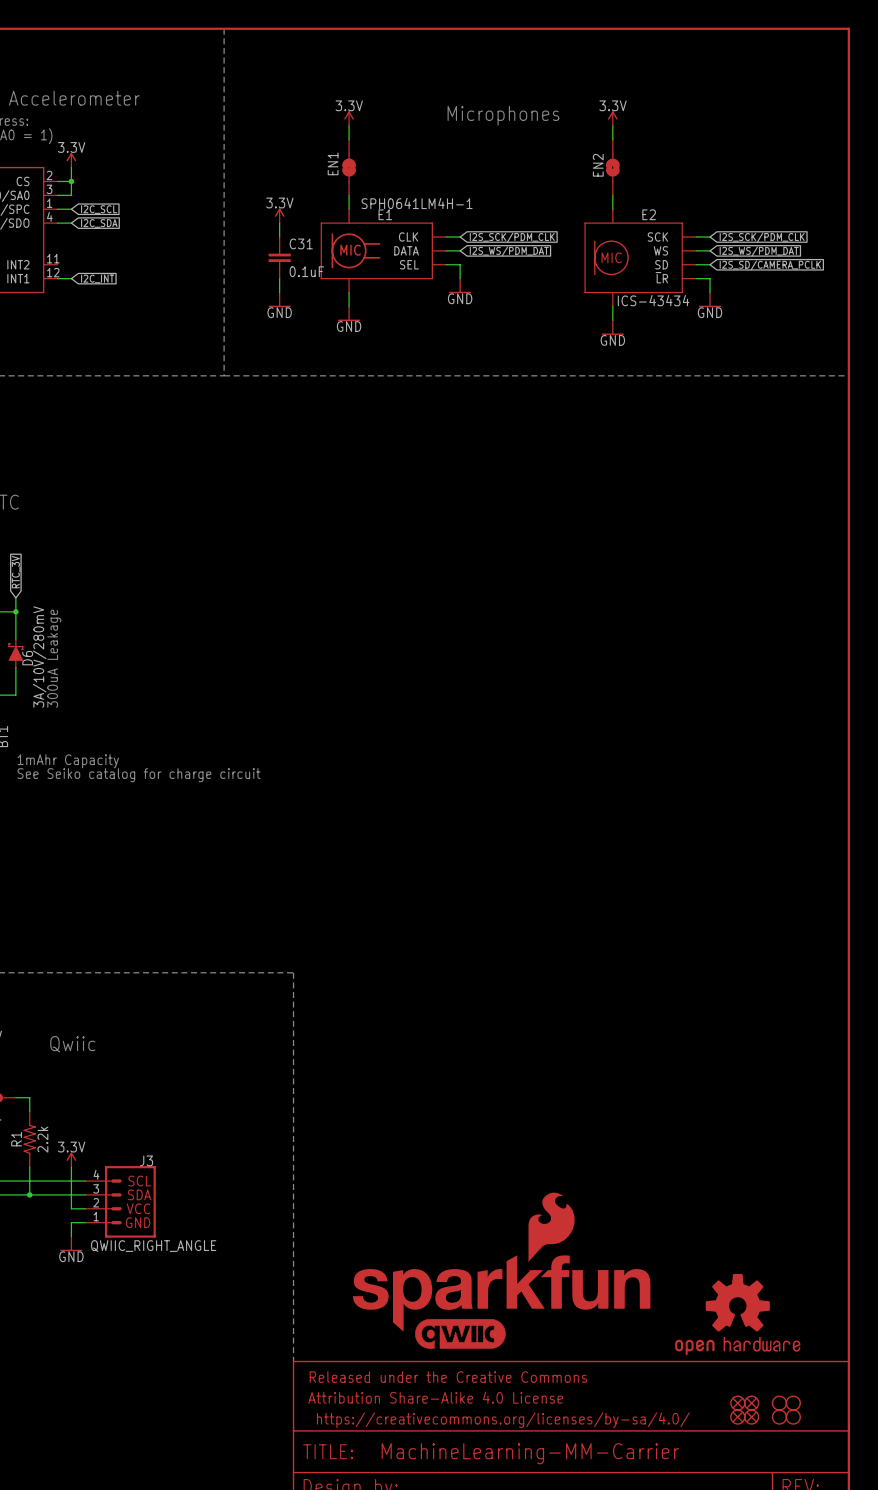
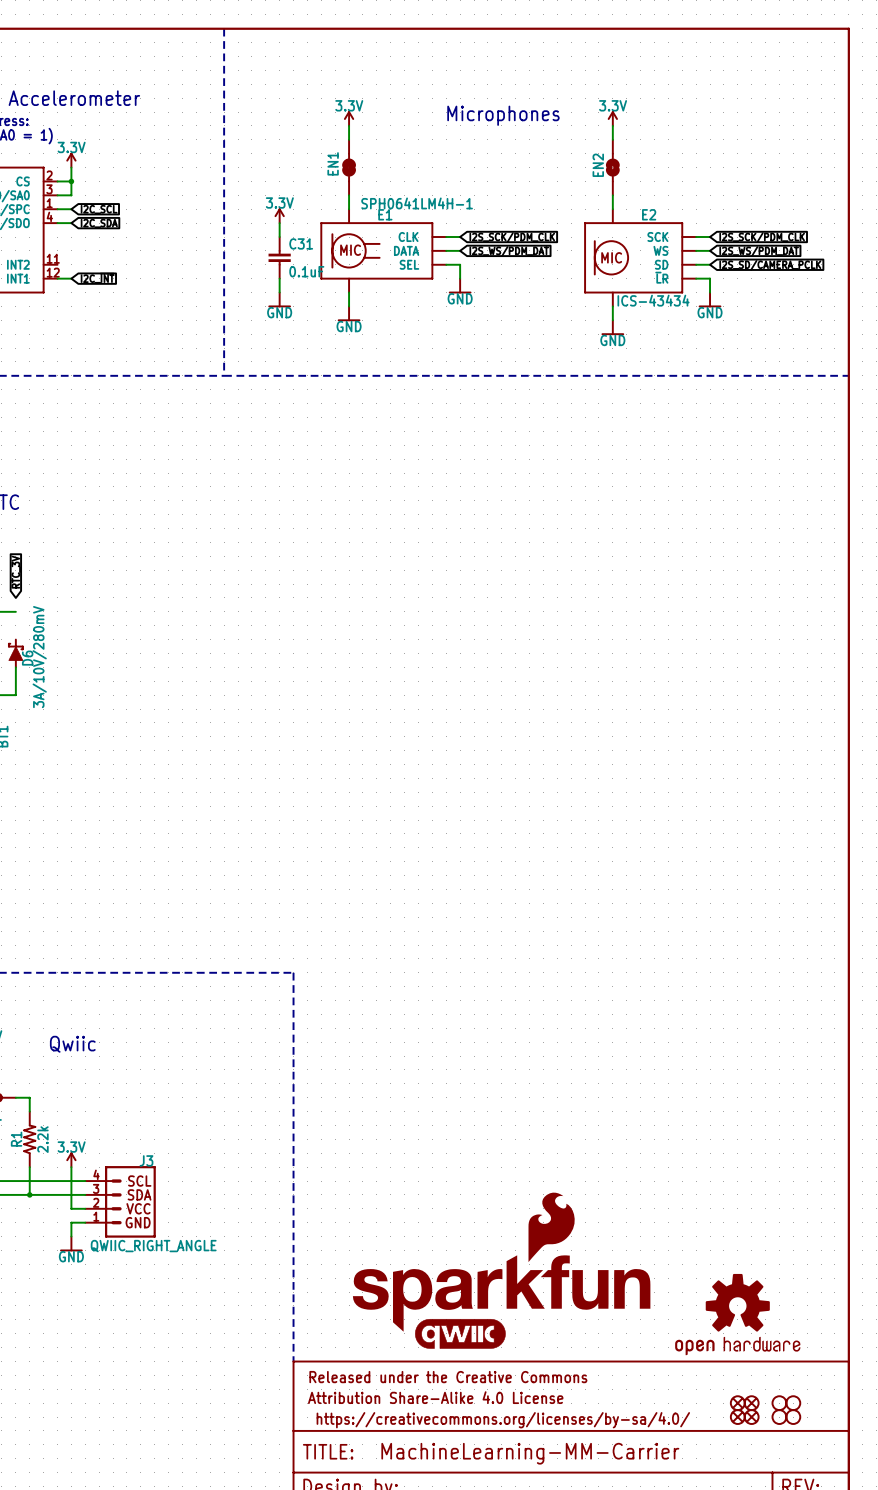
wire: (15, 597) (15, 639) -> none
junction: (15, 611) -> none
text: 300uA Leakage (54, 658) -> none
text: 1mAhr Capacity (68, 761) -> none
text: See Seiko catalog for charge circuit (139, 775) -> none

